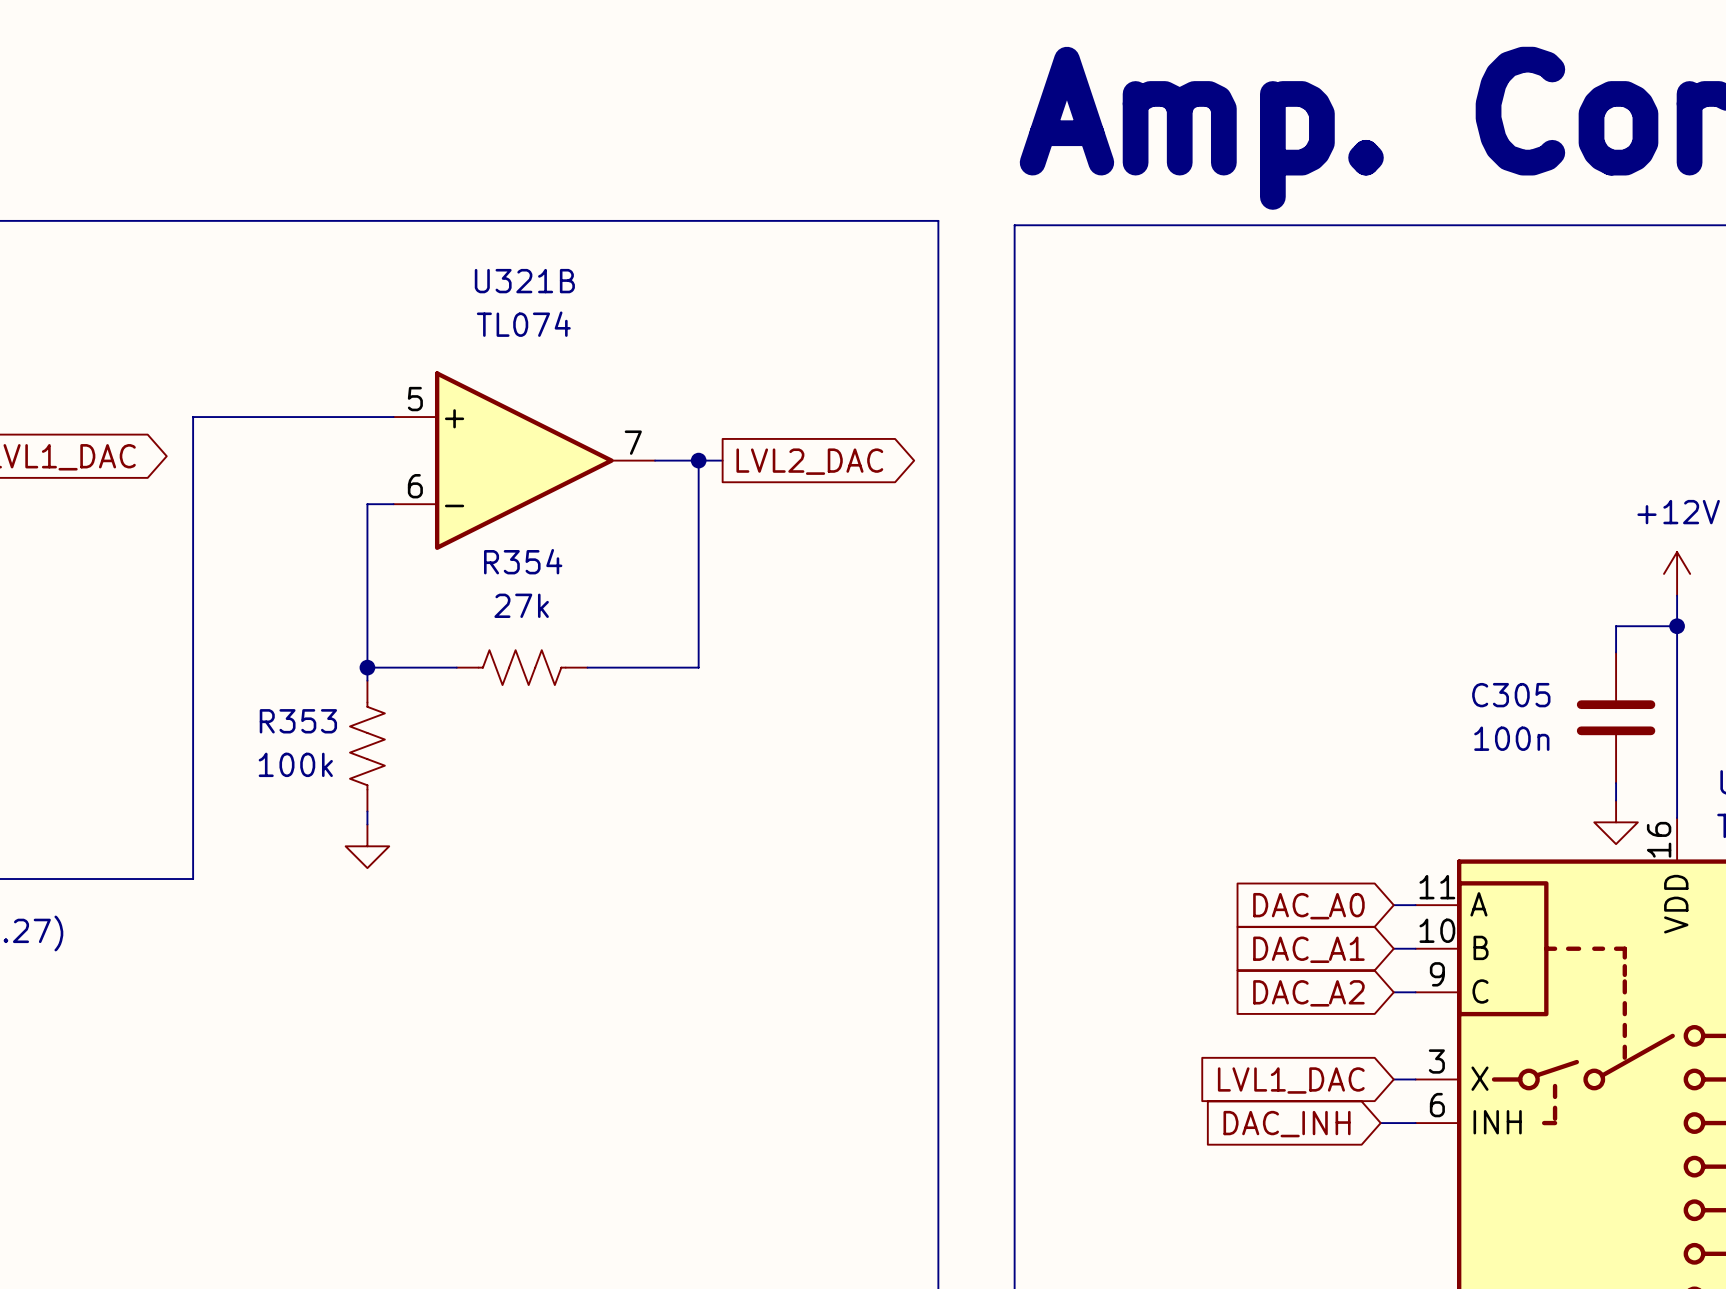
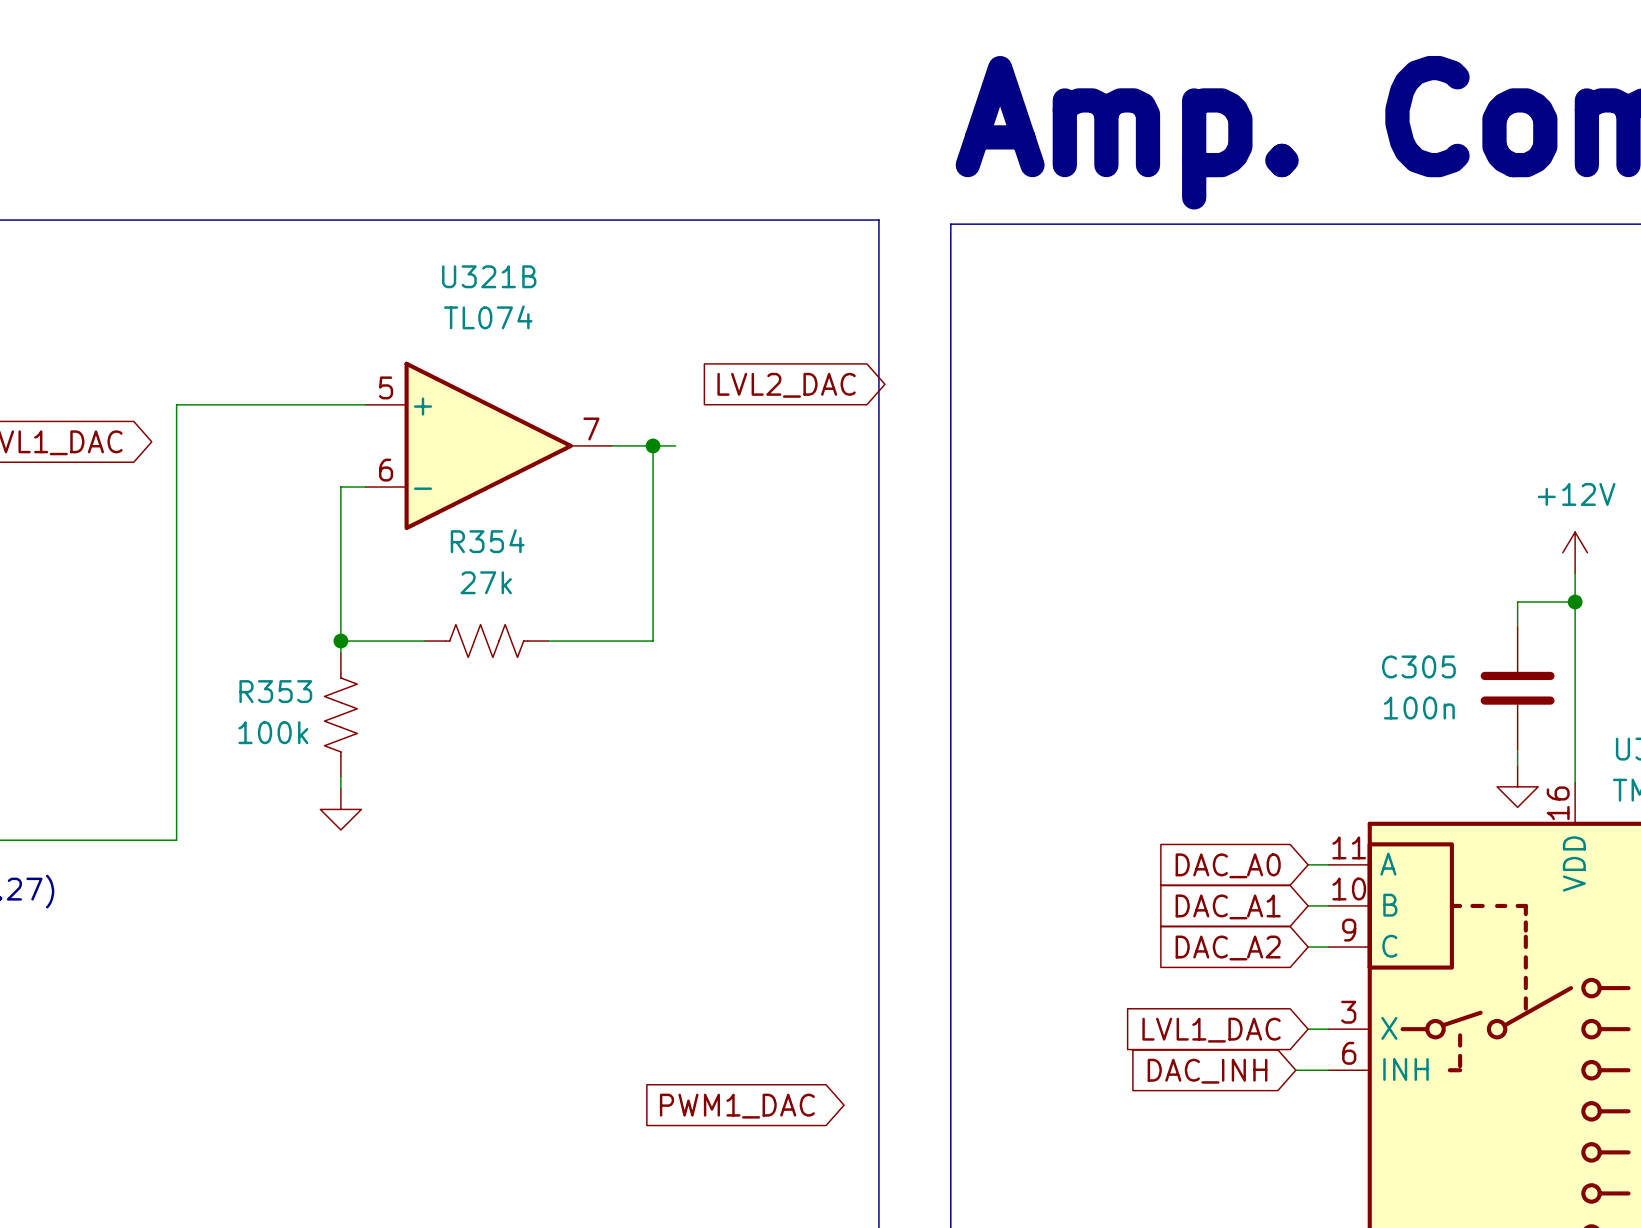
global label position: LVL2_DAC (809, 461) -> LVL2_DAC (786, 385)
global label: none -> PWM1_DAC (737, 1106)

